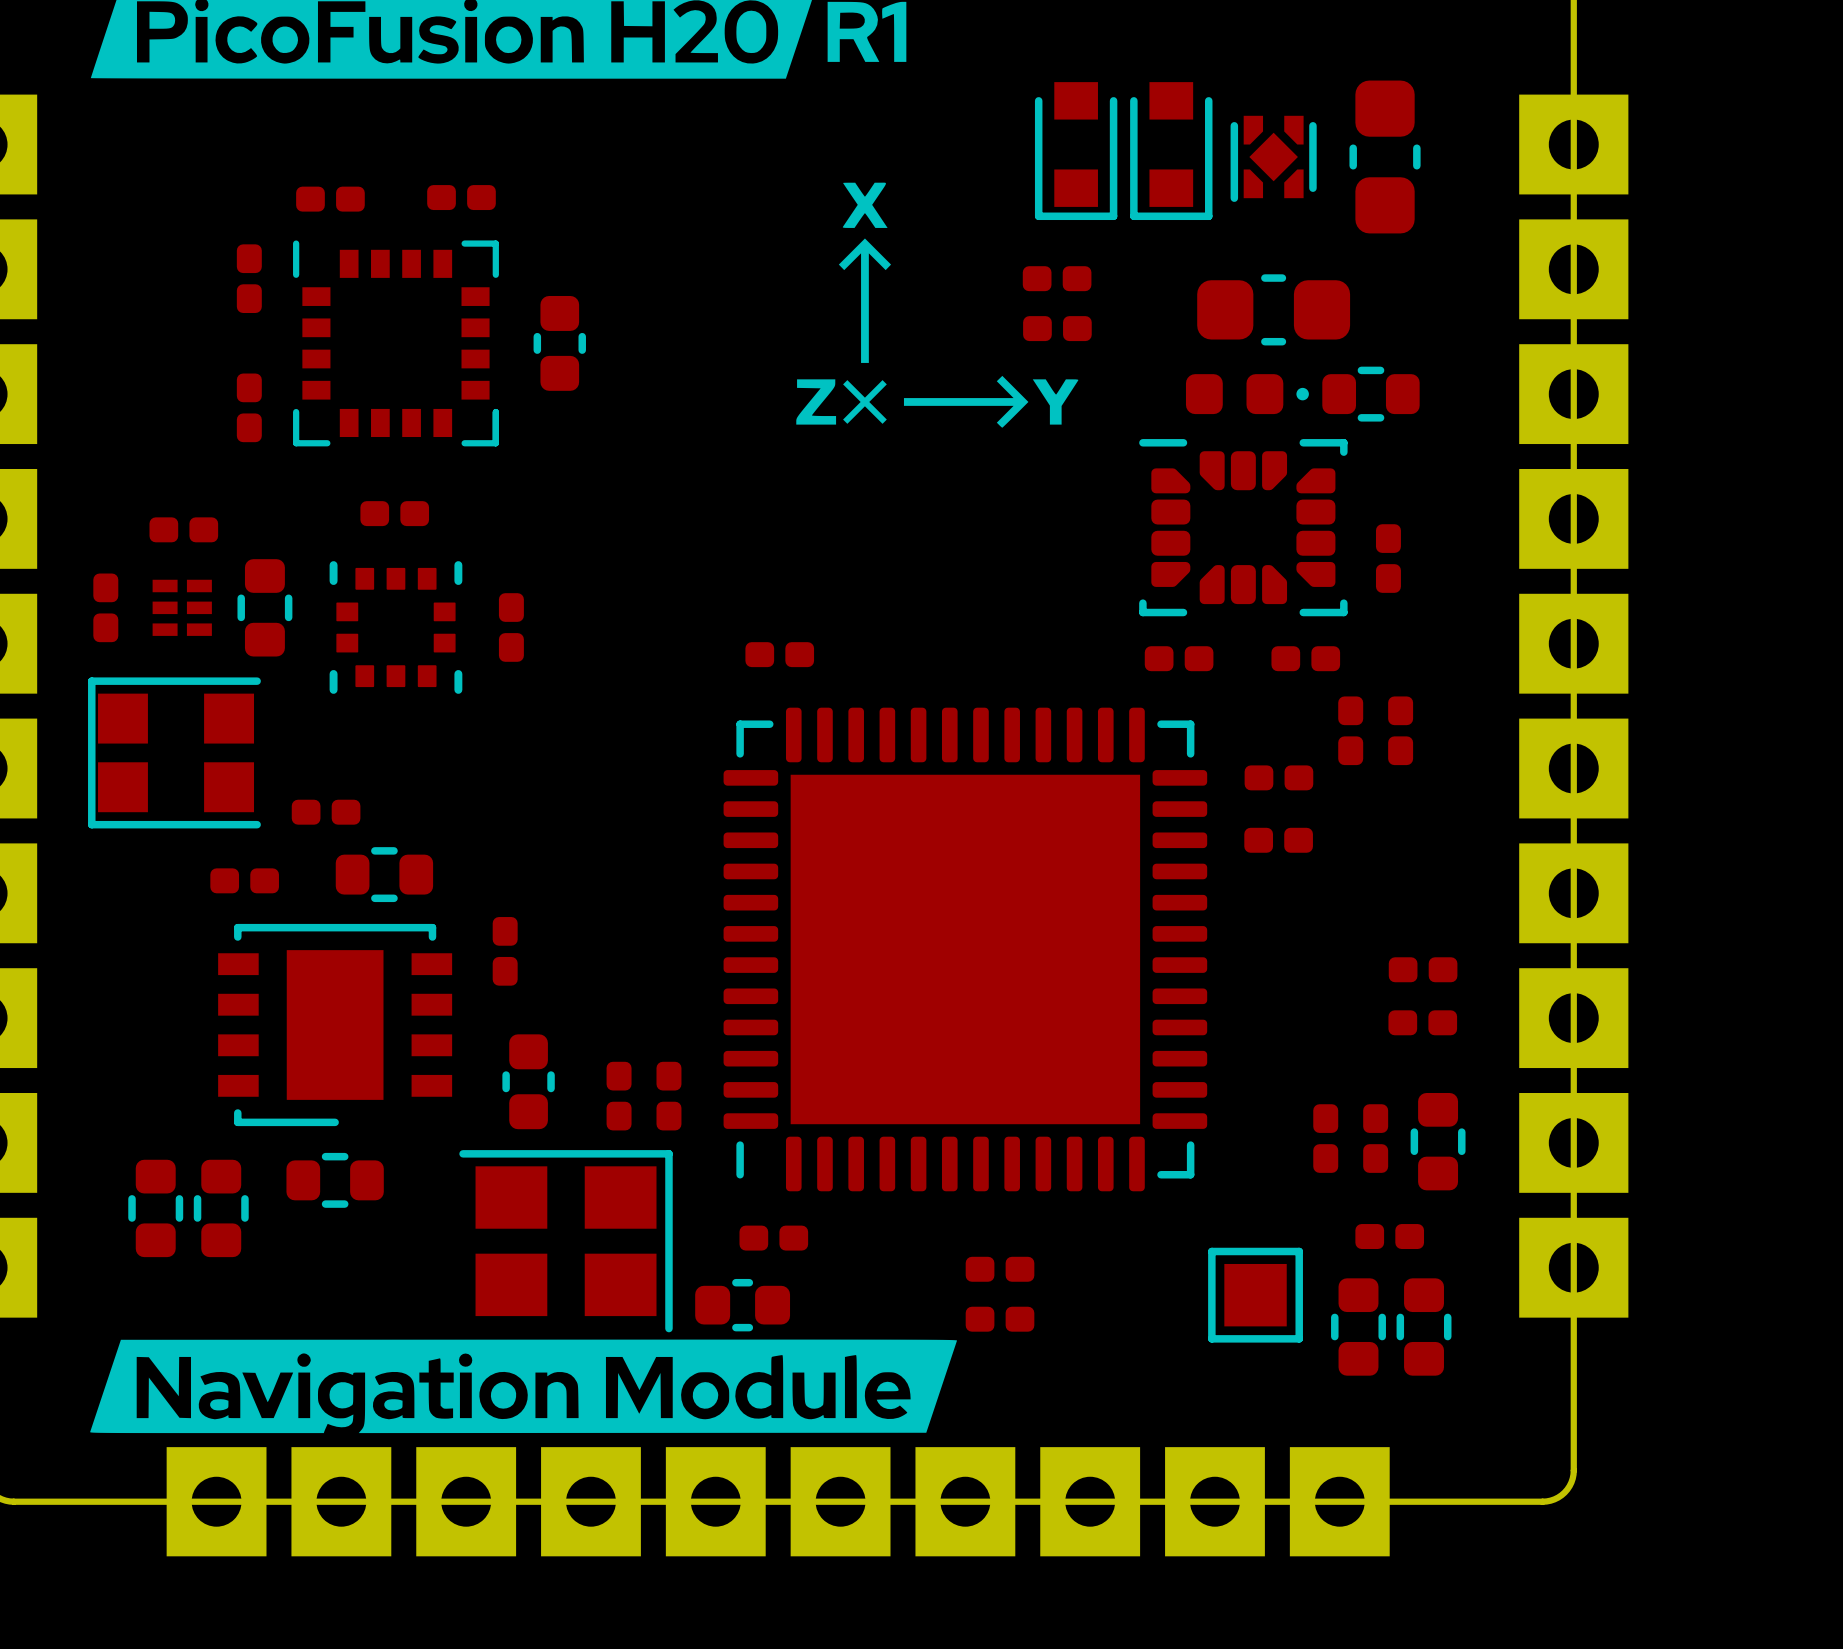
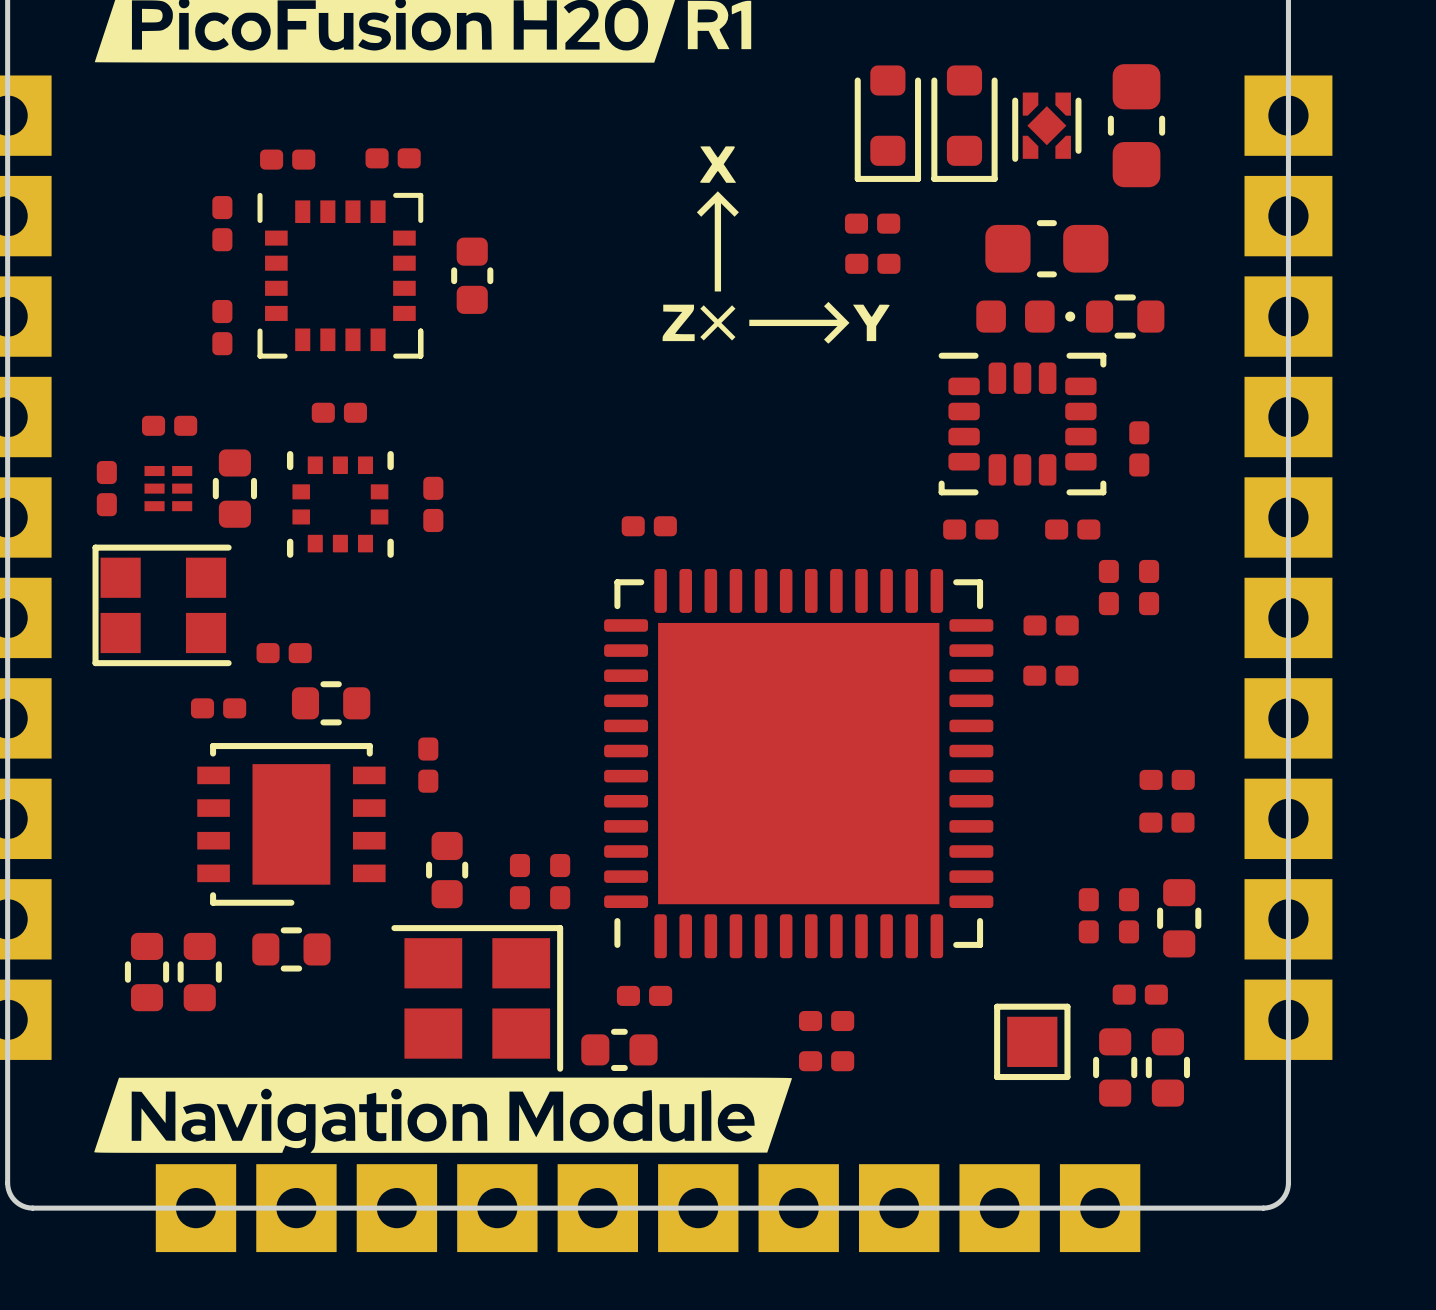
part footprint: [1034, 82, 1118, 221] -> [854, 65, 922, 182]
part footprint: [1130, 82, 1213, 221] -> [931, 65, 998, 182]
part footprint: [1139, 439, 1348, 617] -> [938, 352, 1107, 496]

